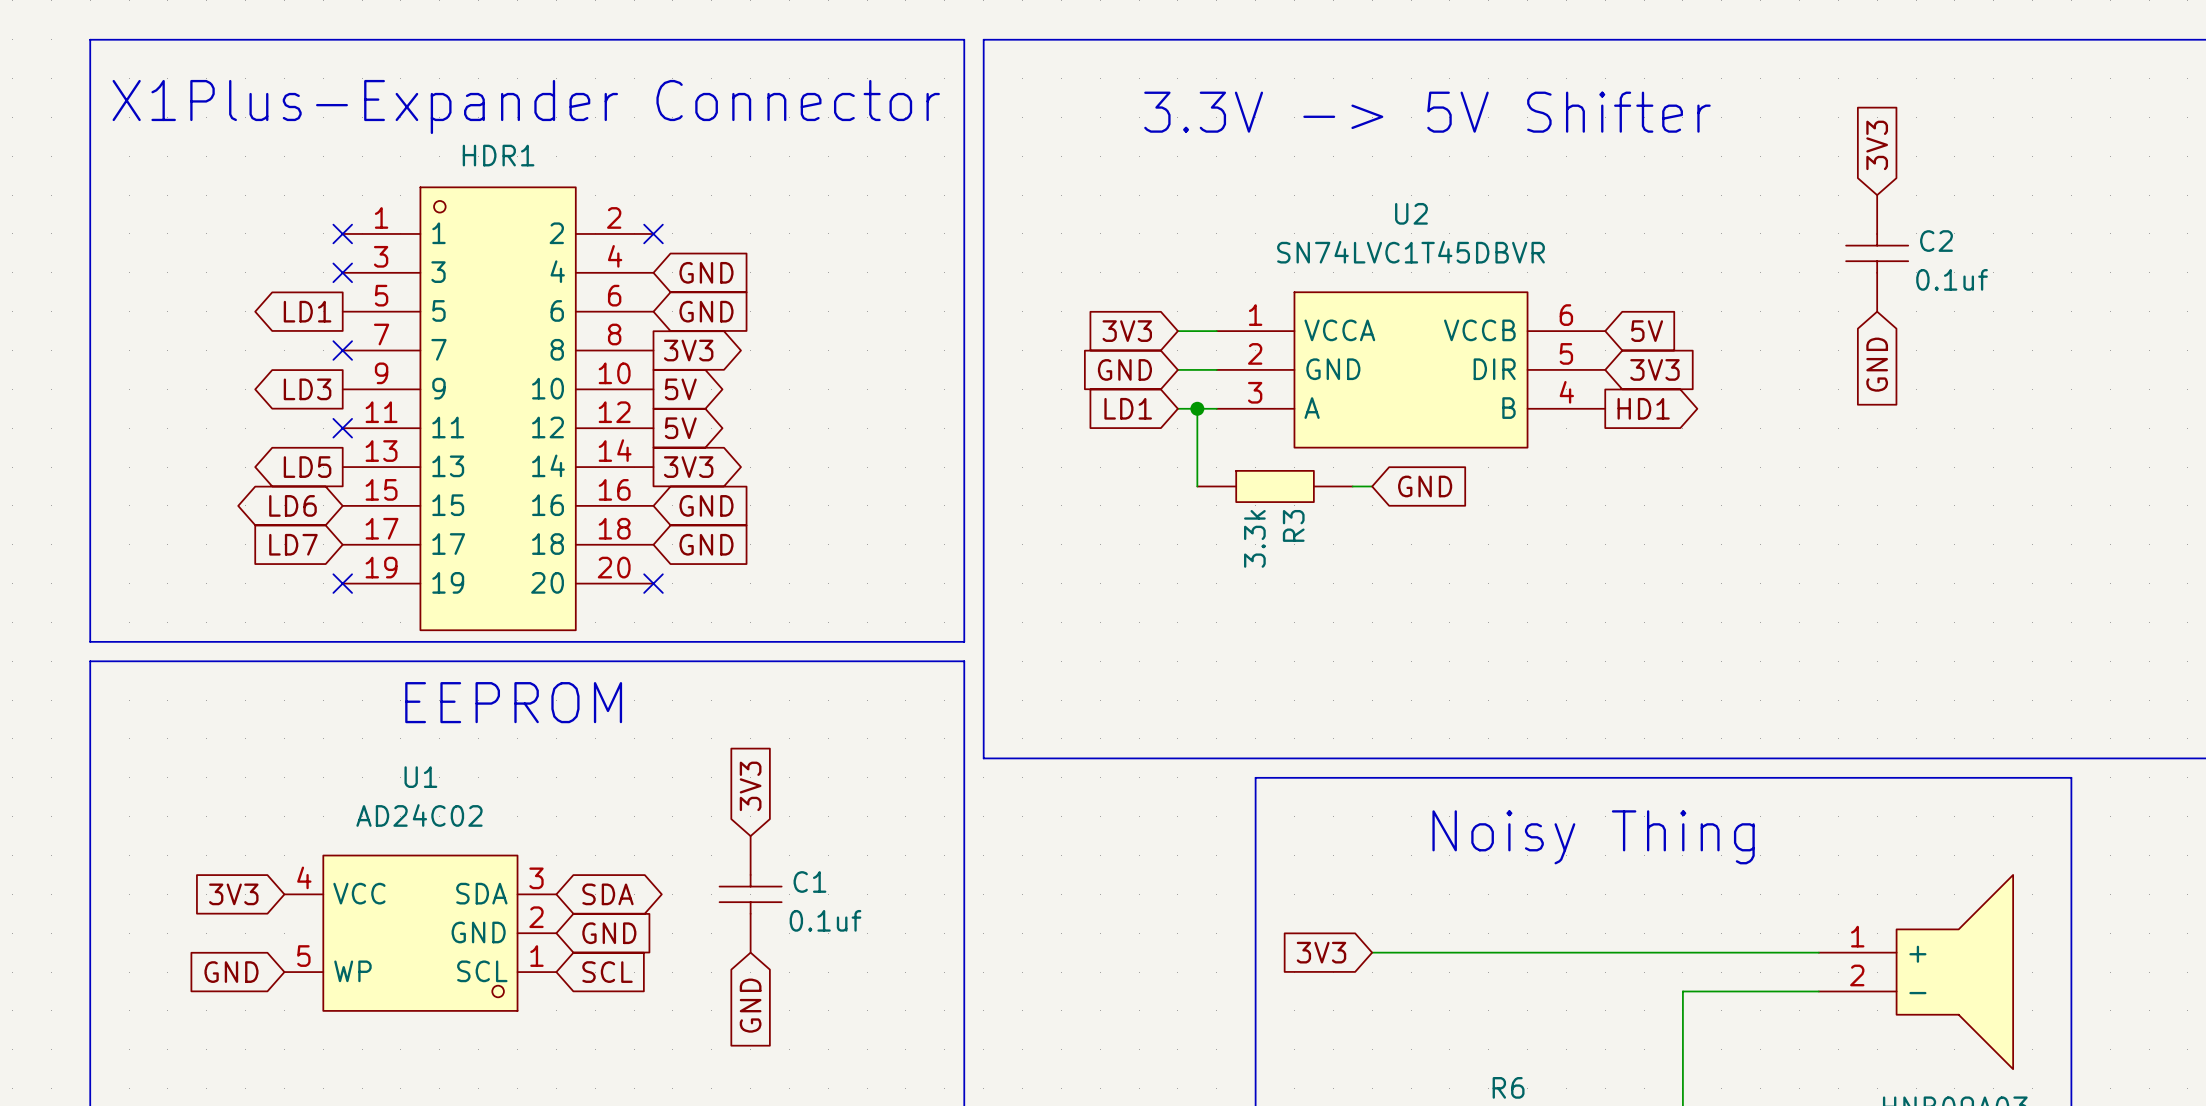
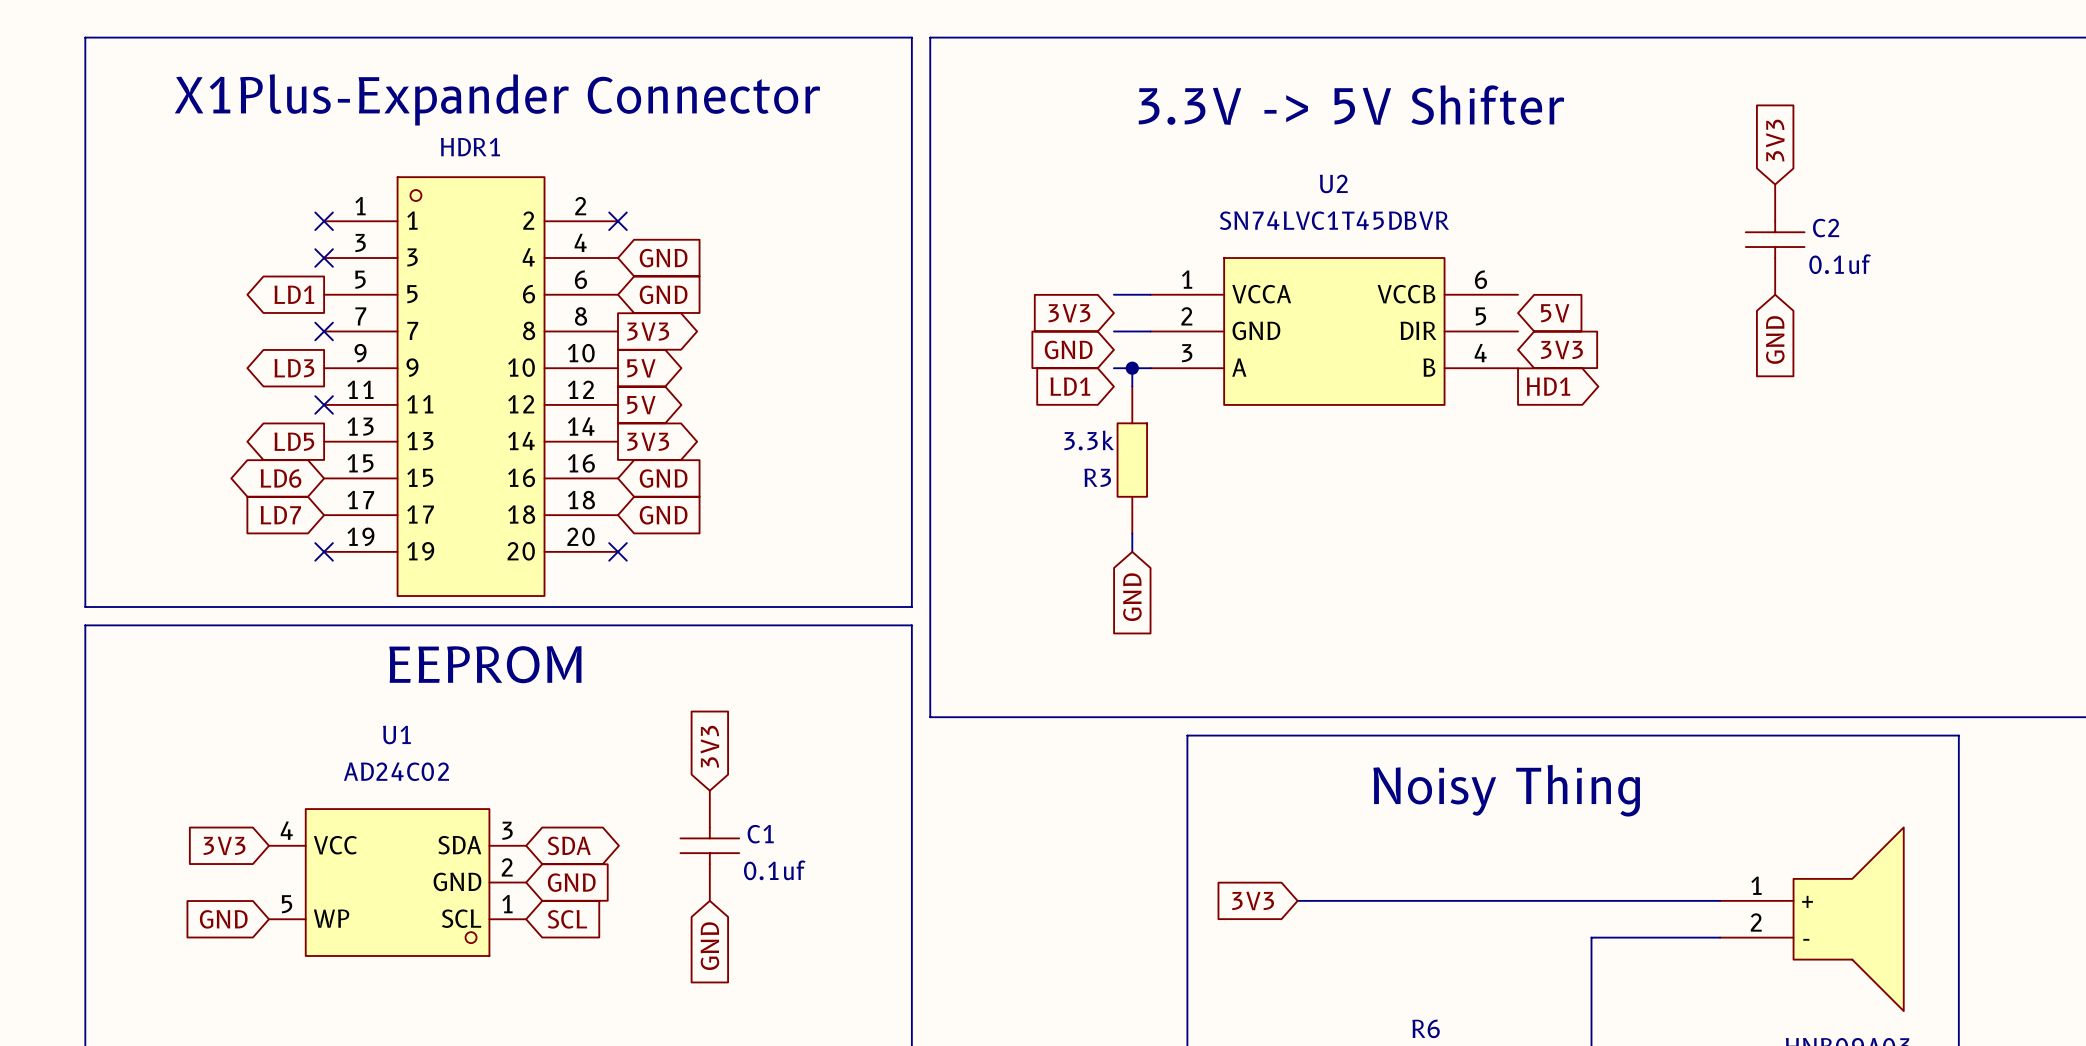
wire: (1177, 331) (1216, 331) -> (1113, 294) (1150, 294)
wire: (1177, 369) (1216, 369) -> (1113, 331) (1150, 331)
U2 position: (1411, 369) -> (1334, 331)
wire: (1177, 408) (1216, 408) -> (1113, 368) (1150, 368)
junction position: (1197, 408) -> (1132, 368)
R3 rotation: 0° (1275, 486) -> 90° clockwise (1132, 460)
wire: (1352, 486) (1372, 486) -> none
global label rotation: 0° (1425, 486) -> 90° clockwise (1132, 597)
global label position: GND (1425, 486) -> GND (1132, 597)
wire: none -> (1132, 533) (1132, 551)

